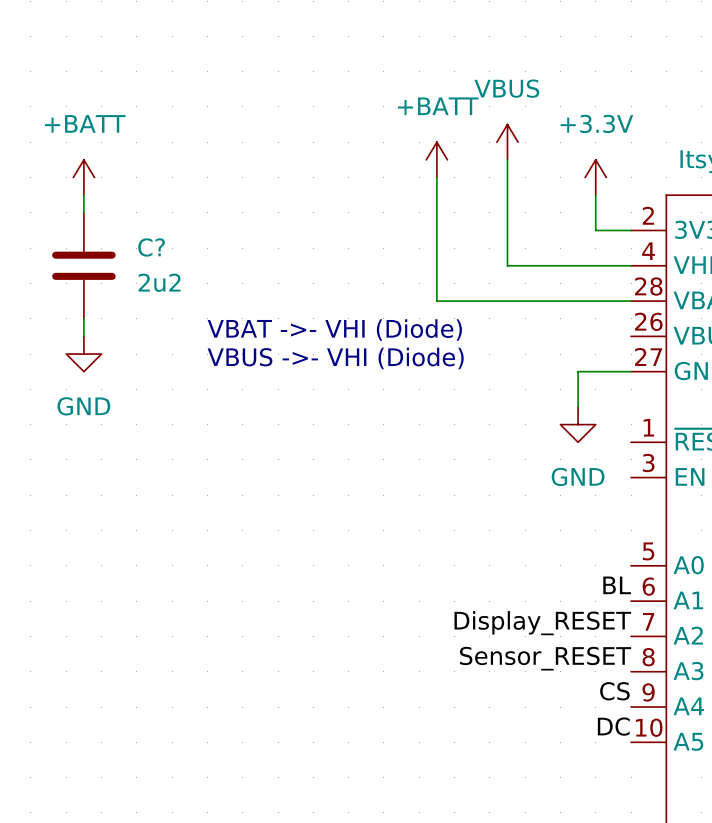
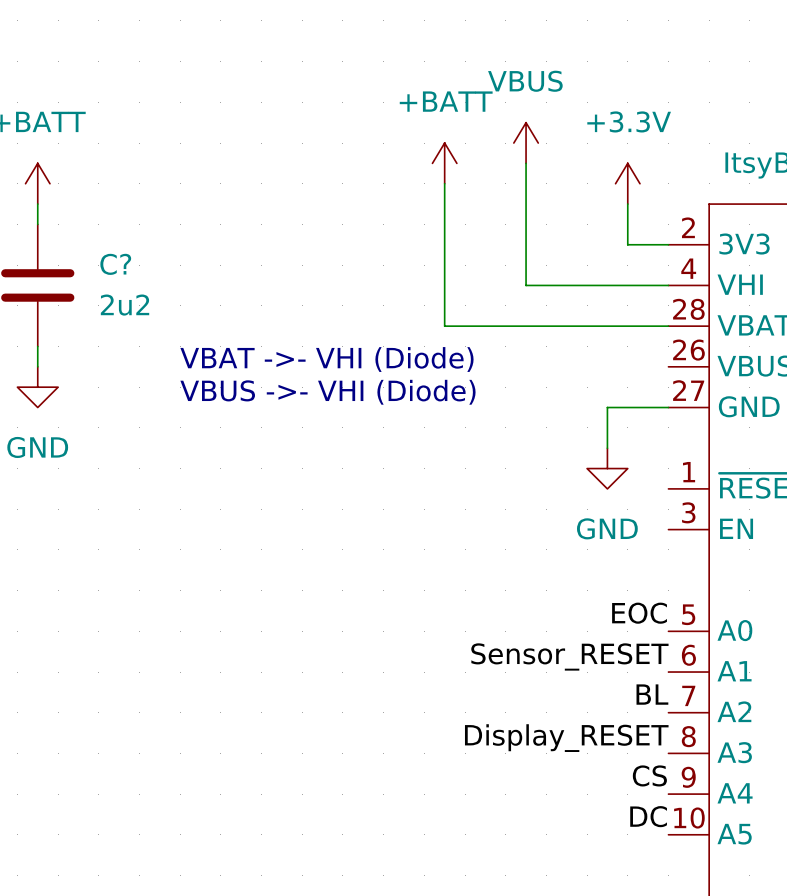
label: none -> EOC (639, 613)
label: BL (617, 585) -> Sensor_RESET (569, 656)
label: Display_RESET (542, 623) -> BL (652, 694)
label: Sensor_RESET (545, 658) -> Display_RESET (566, 738)

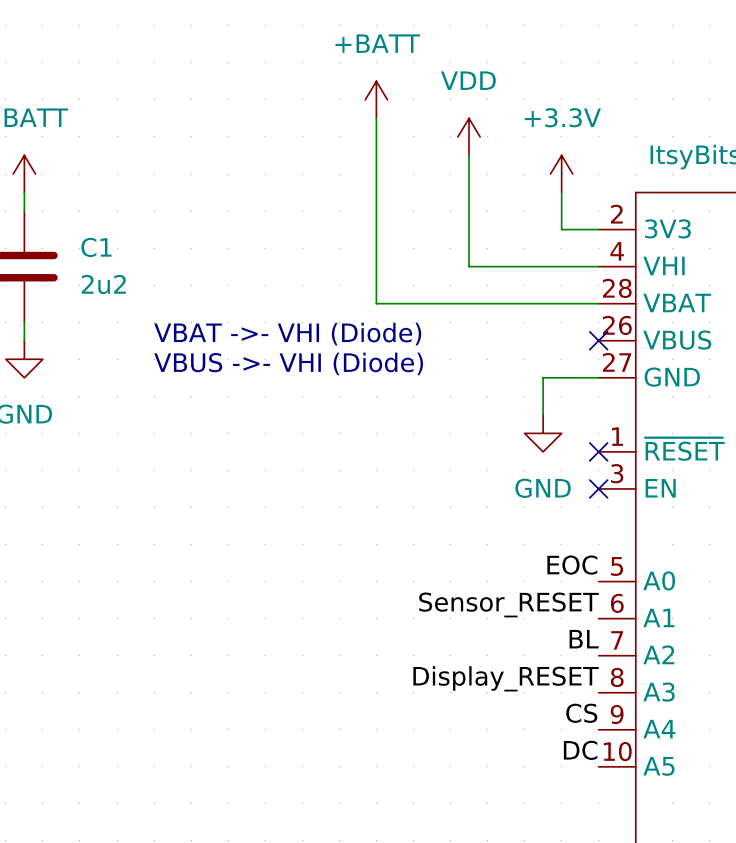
power symbol: VBUS (526, 143) -> VDD (469, 136)
power symbol position: +BATT (444, 163) -> +BATT (376, 99)
wire: (444, 183) (444, 326) -> (376, 118) (376, 303) (394, 303)
C? name: C? (115, 264) -> C1 (96, 247)
no-connect mark: none -> (598, 340)
no-connect mark: none -> (598, 451)
no-connect mark: none -> (598, 488)

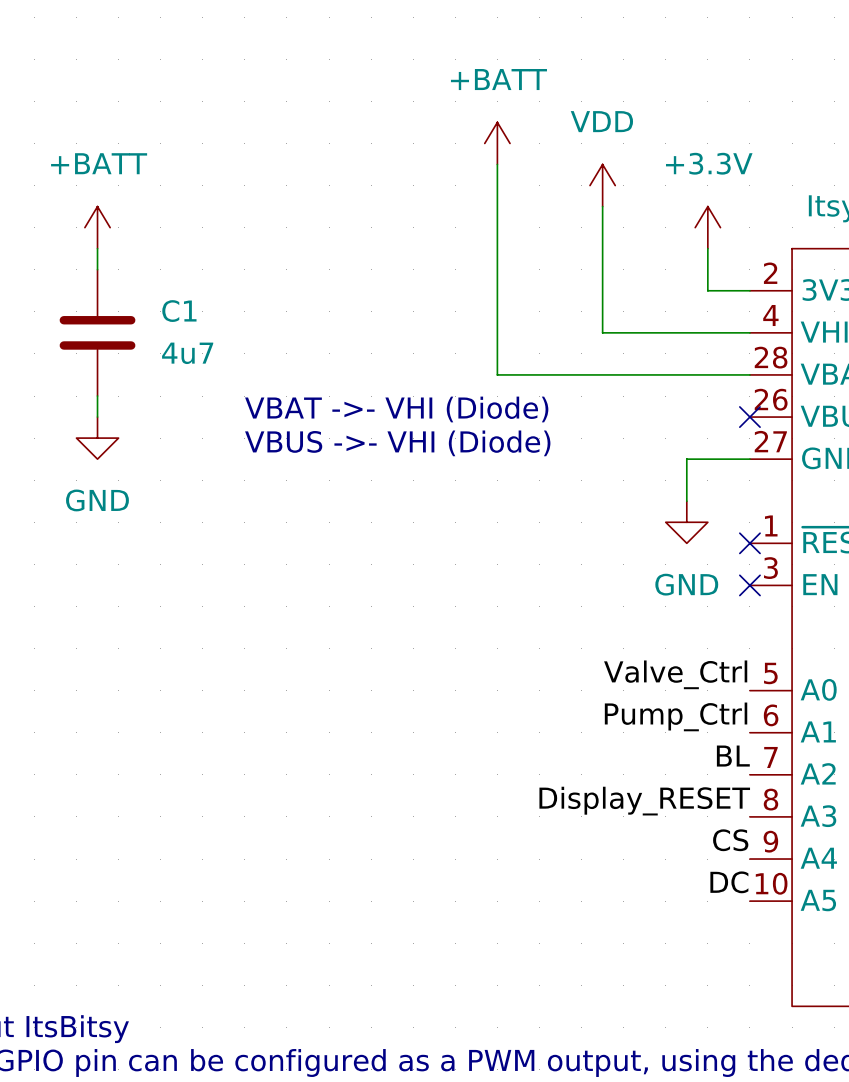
C1 value: 2u2 (103, 284) -> 4u7 (187, 353)
label: EOC (572, 565) -> Valve_Ctrl (675, 674)
label: Sensor_RESET (508, 604) -> Pump_Ctrl (676, 716)

